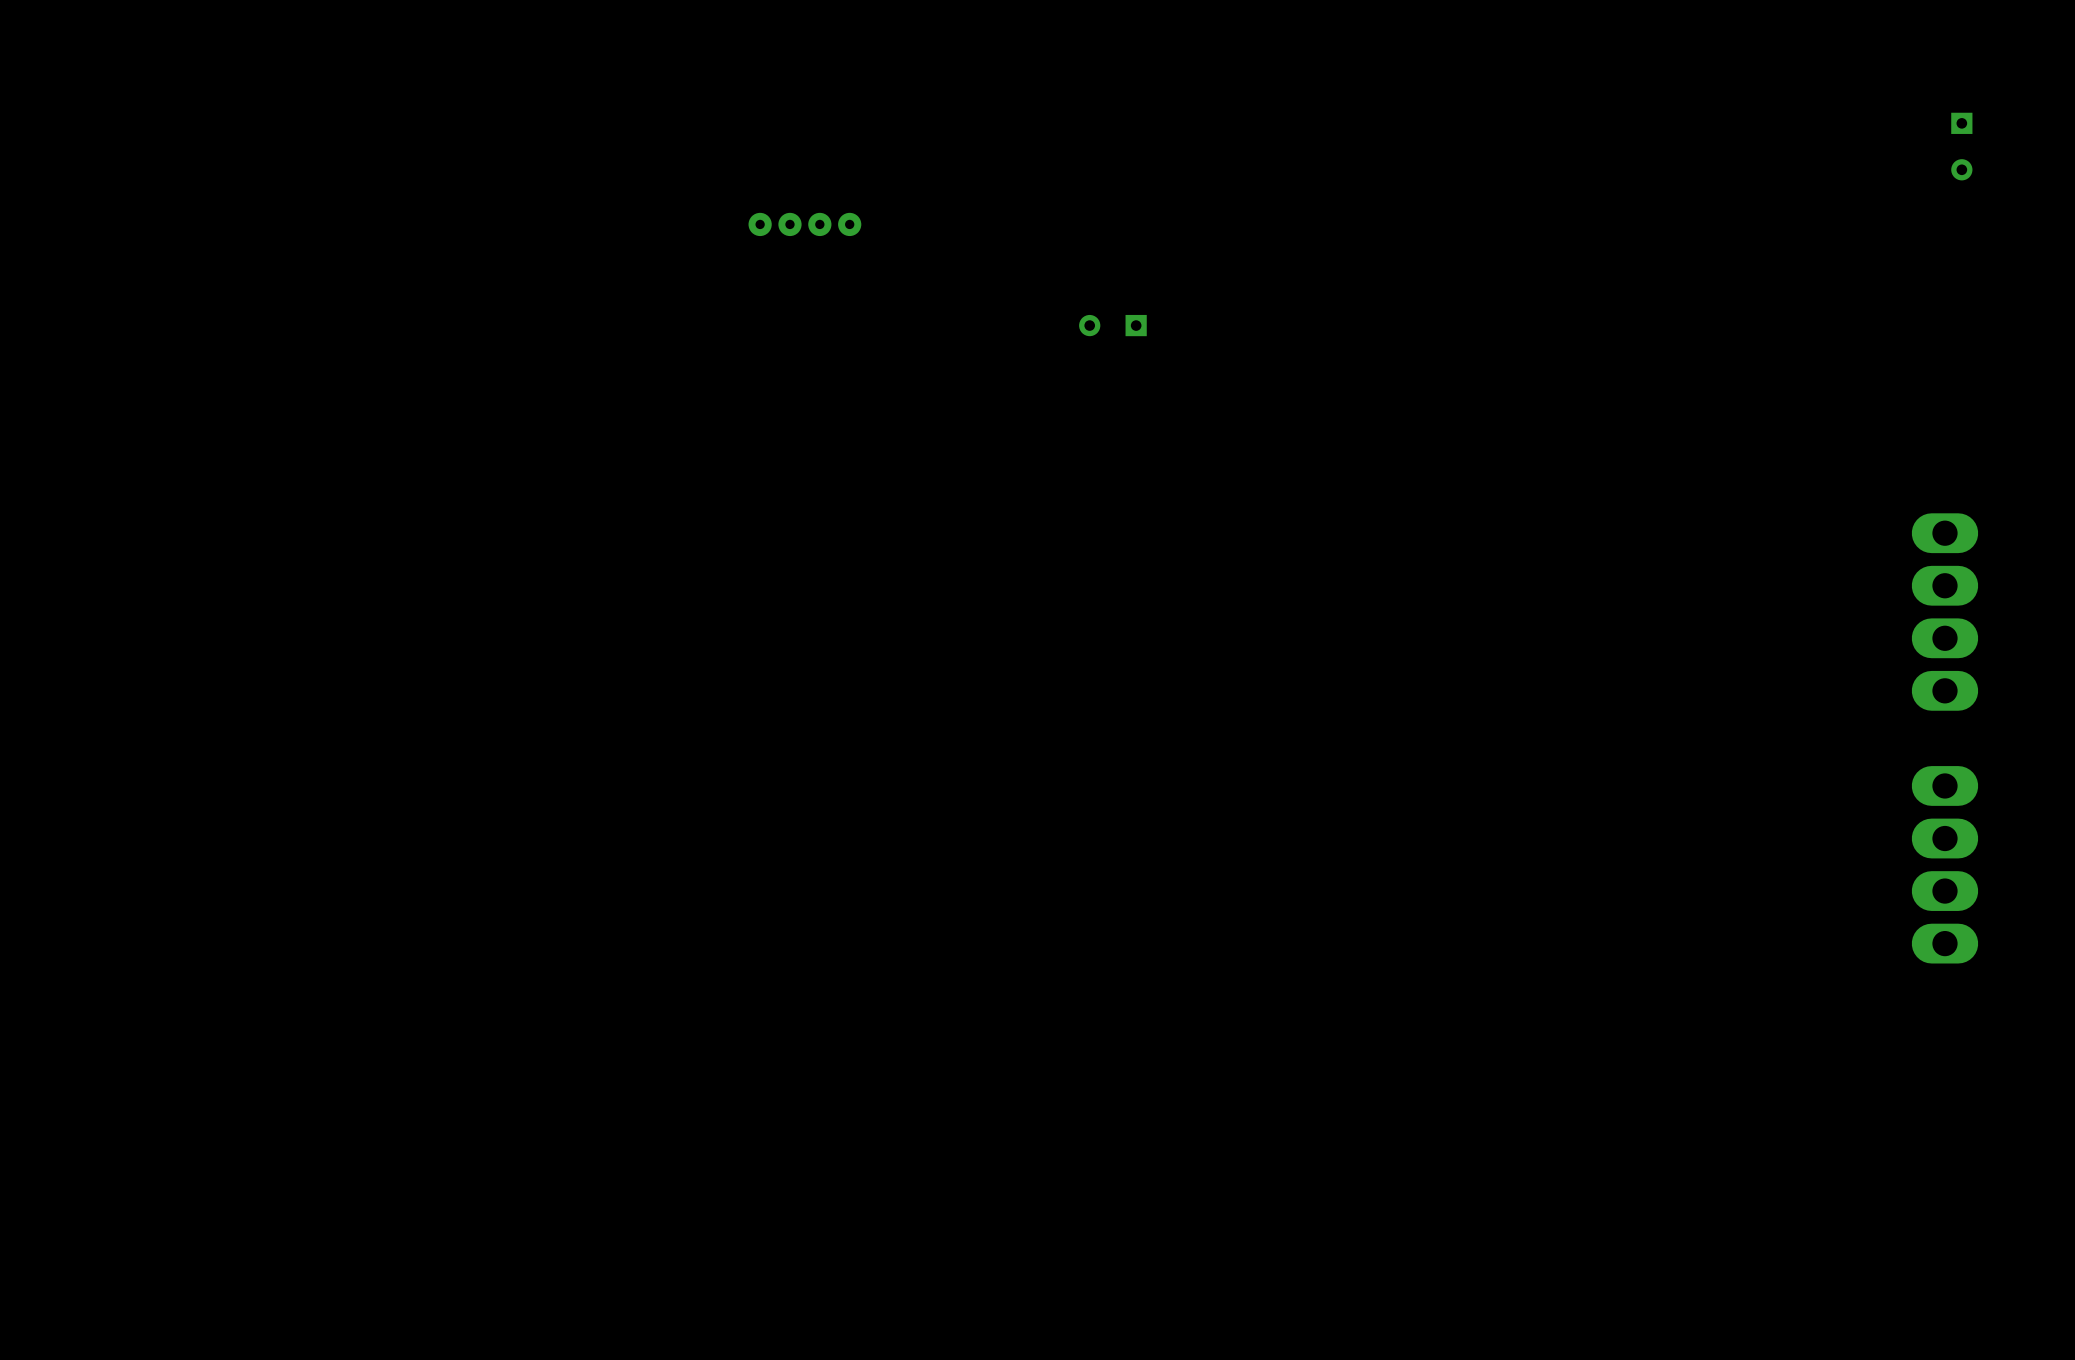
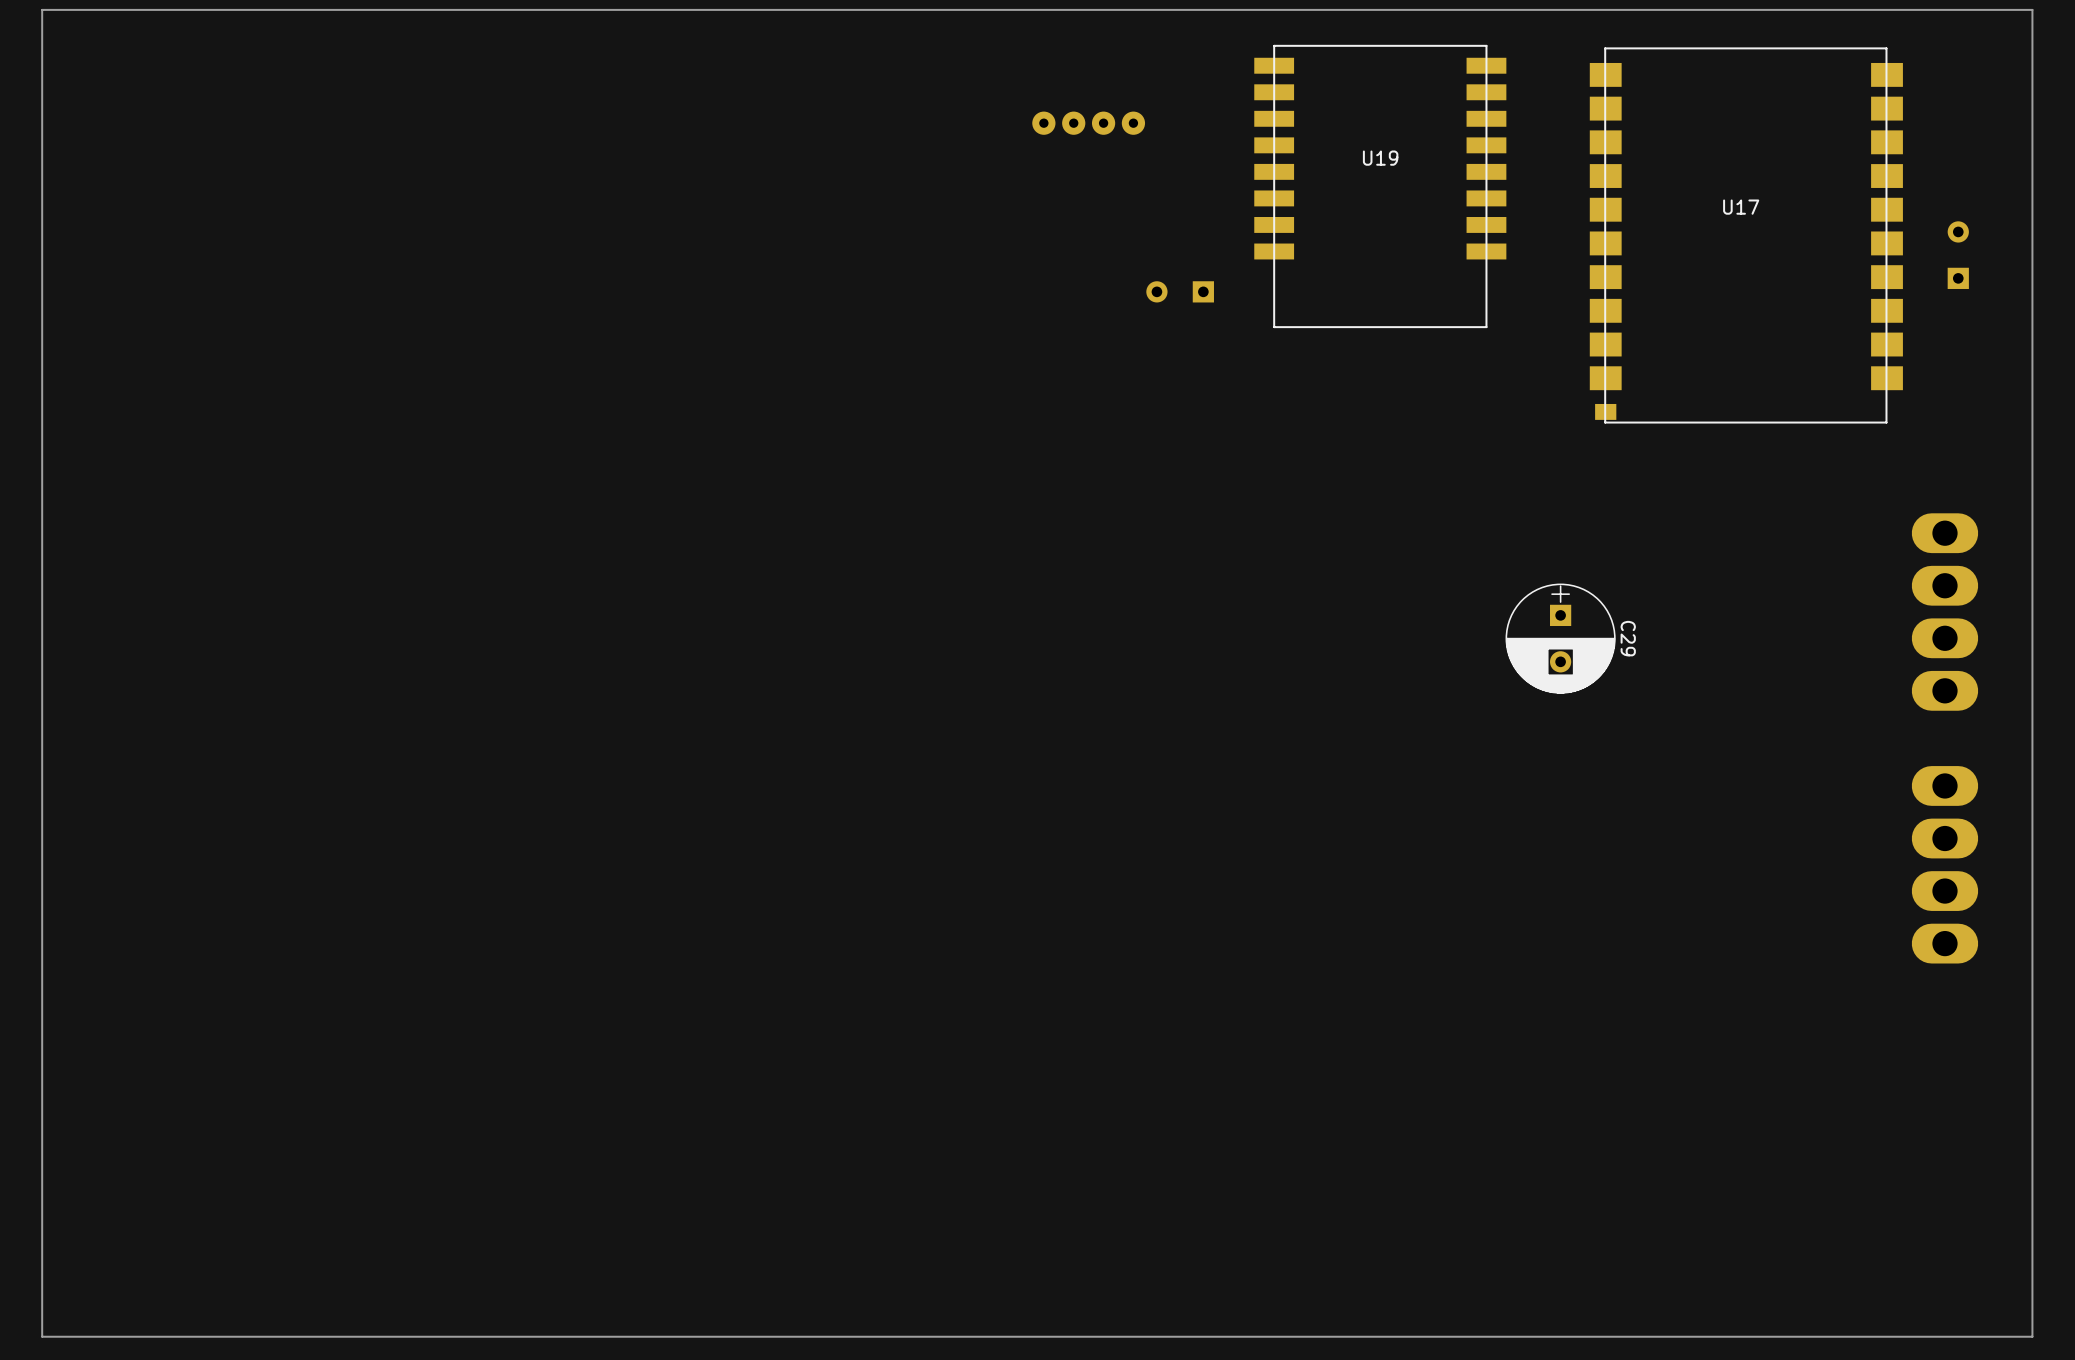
part rotation: 0° (1961, 146) -> 180° (1958, 255)
part position: (1961, 146) -> (1958, 255)
U19: none -> (1380, 186)
part position: (804, 224) -> (1088, 123)
U17: none -> (1746, 235)
part position: (1112, 325) -> (1180, 291)
C29: none -> (1560, 638)
board edge: none -> (42, 1336) (42, 9) (2032, 9) (2032, 1336) (42, 1336)

